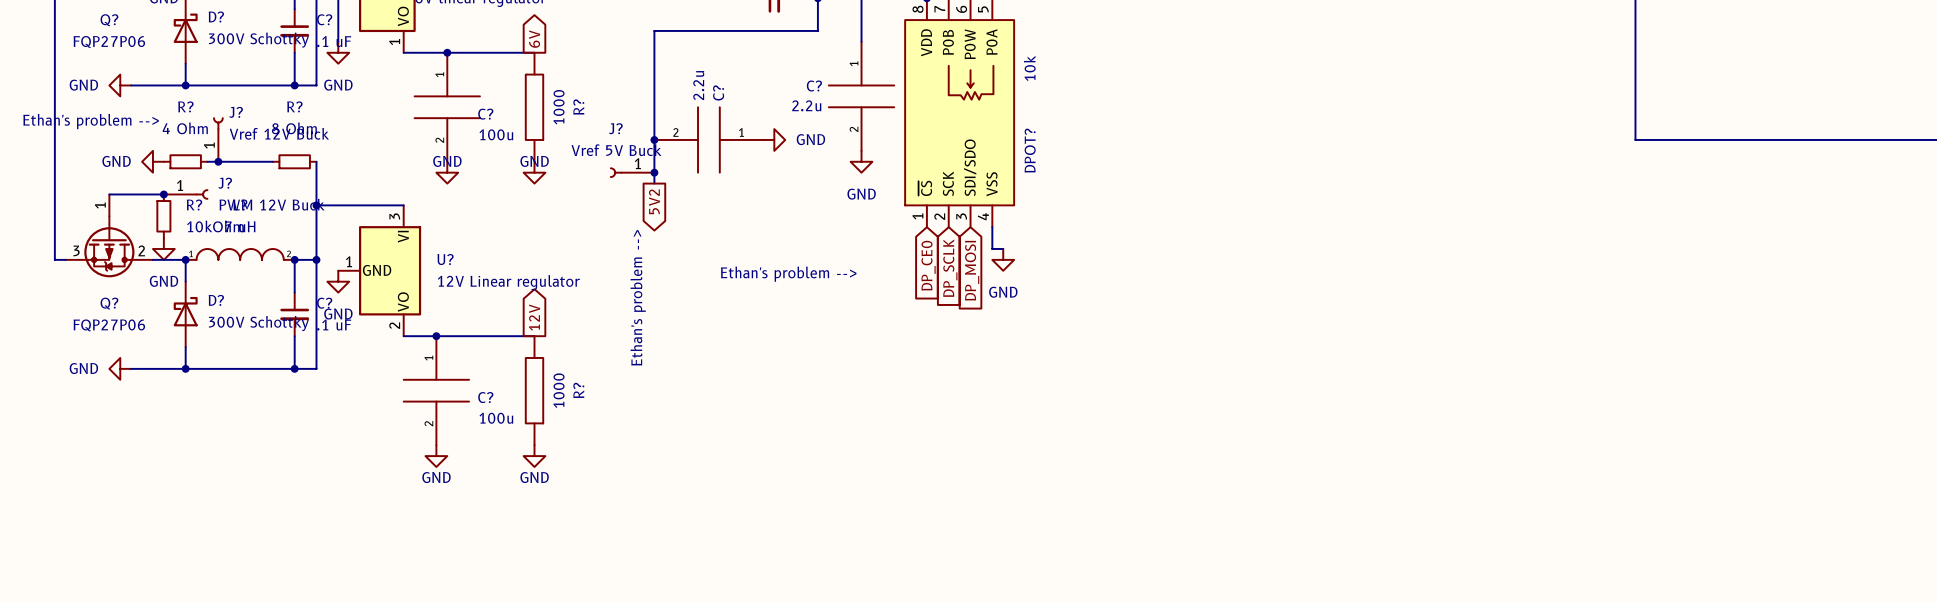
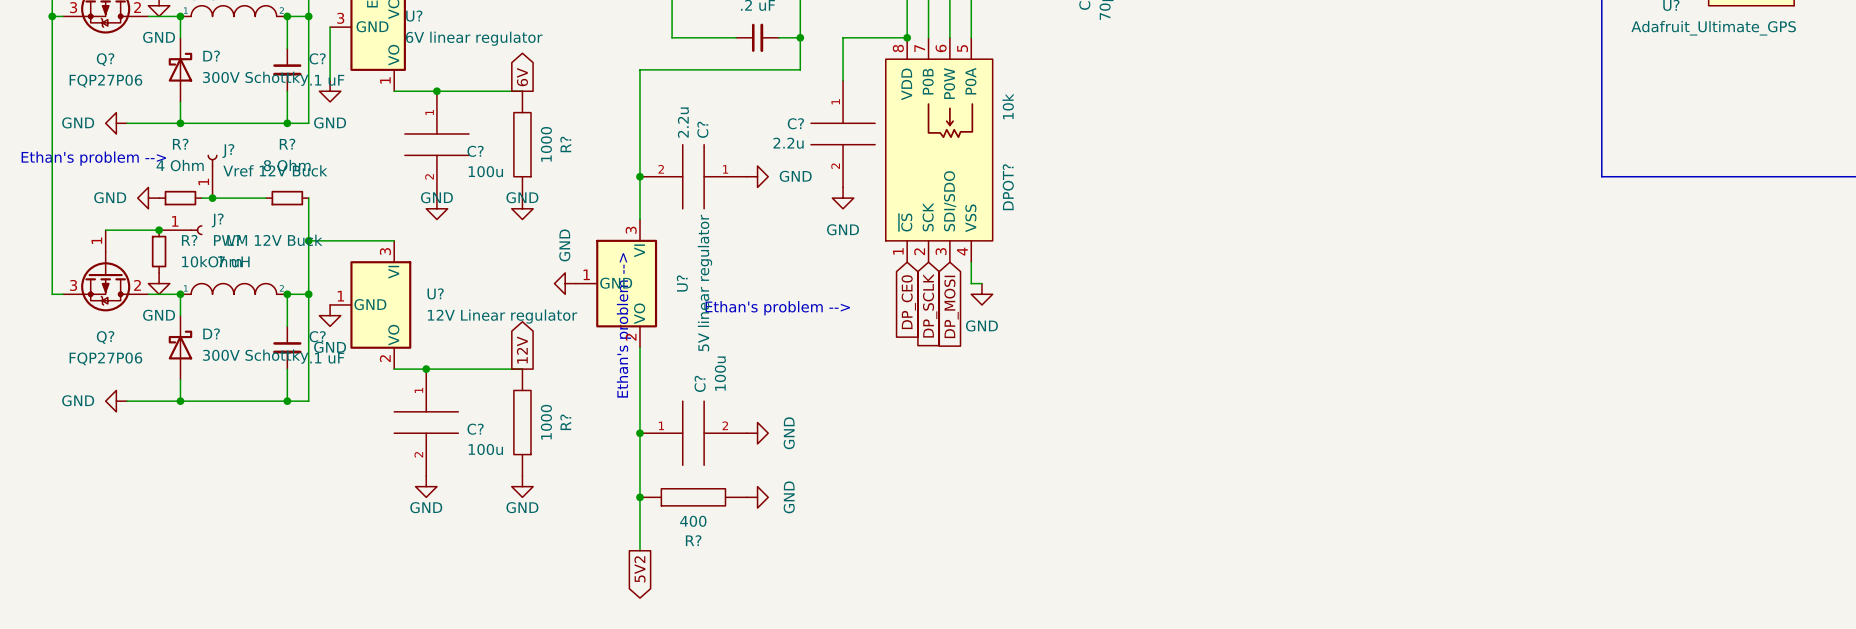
J?: Vref 5V Buck (632, 172) -> none
junction: (654, 172) -> none
global label: 5V2 (654, 201) -> none
power symbol: none -> GND (565, 283)
U?: none -> 5V linear regulator (616, 283)
wire: none -> (639, 347) (639, 550)
junction: none -> (639, 433)
C?: none -> 100u (693, 433)
power symbol: none -> GND (757, 433)
junction: none -> (639, 497)
R?: none -> 400 (693, 497)
power symbol: none -> GND (757, 497)
global label: none -> 5V2 (640, 569)

